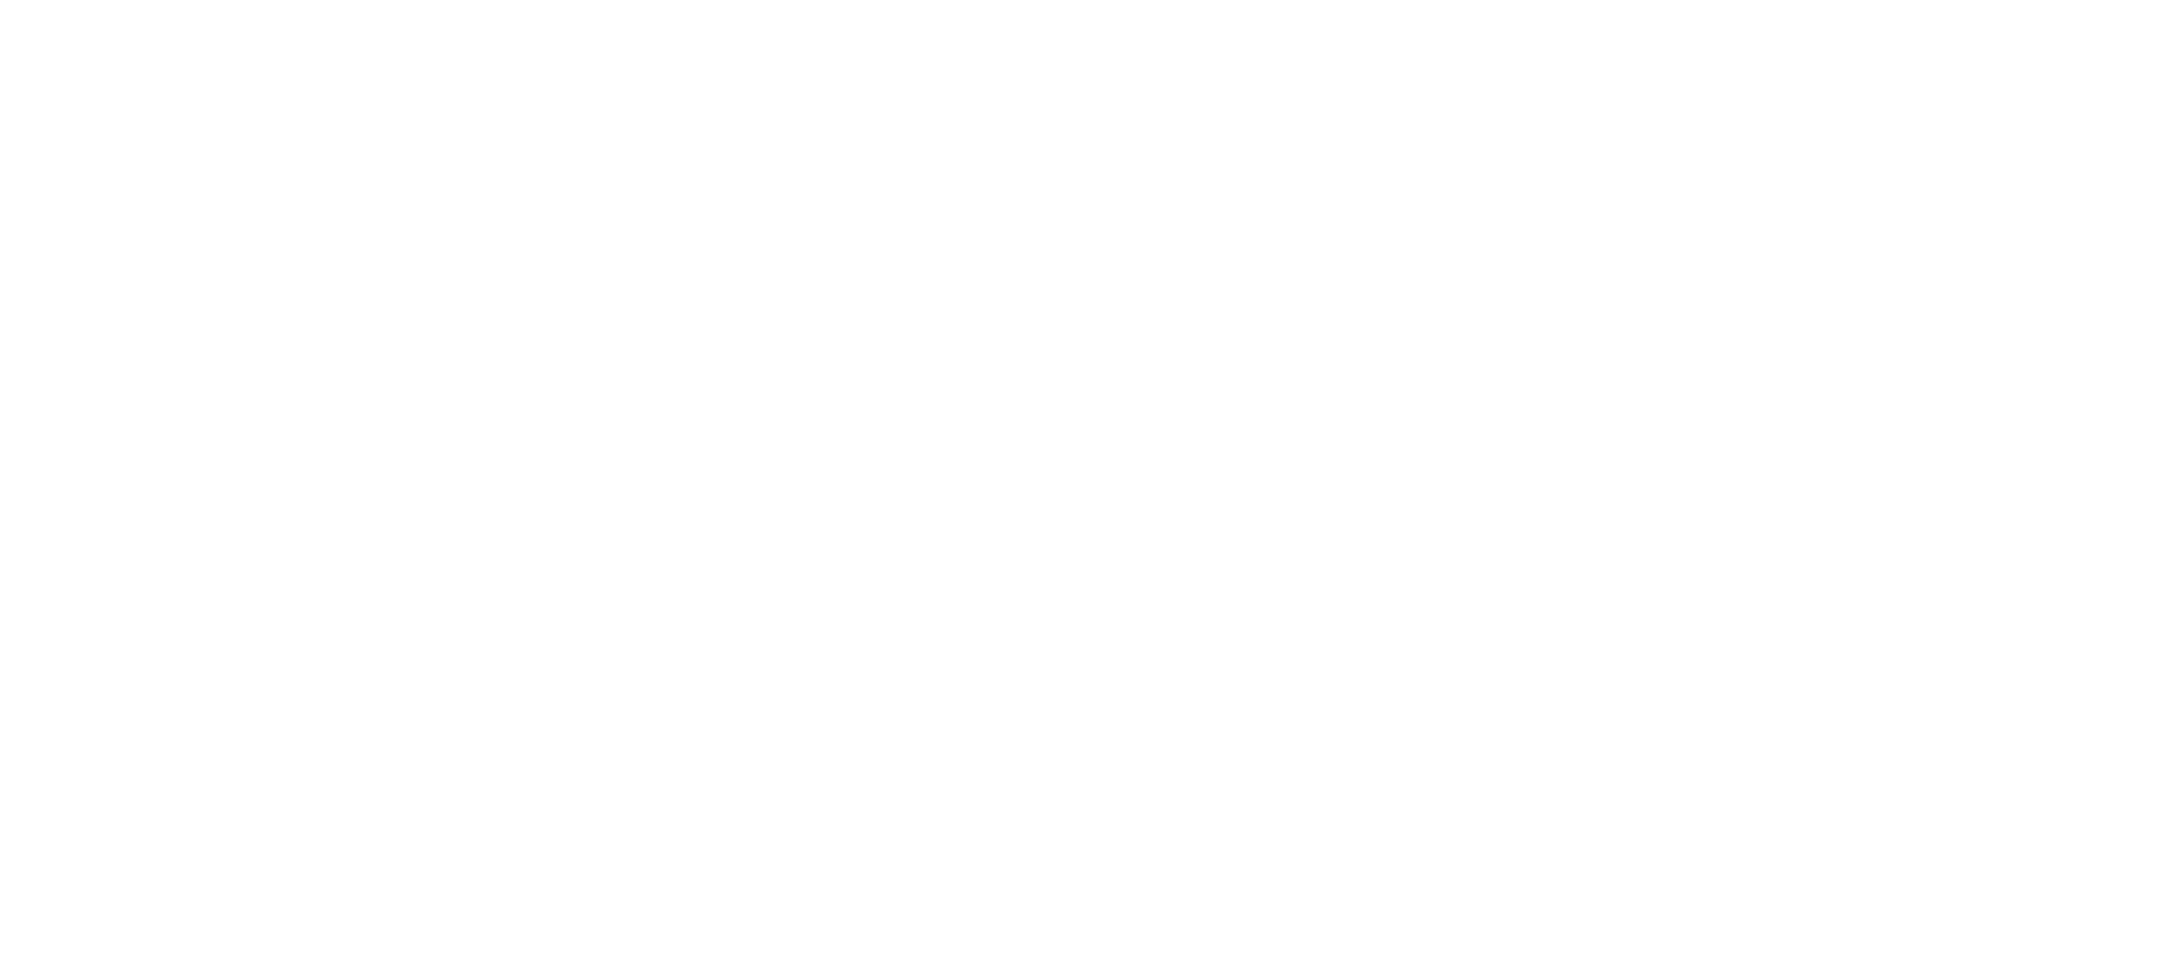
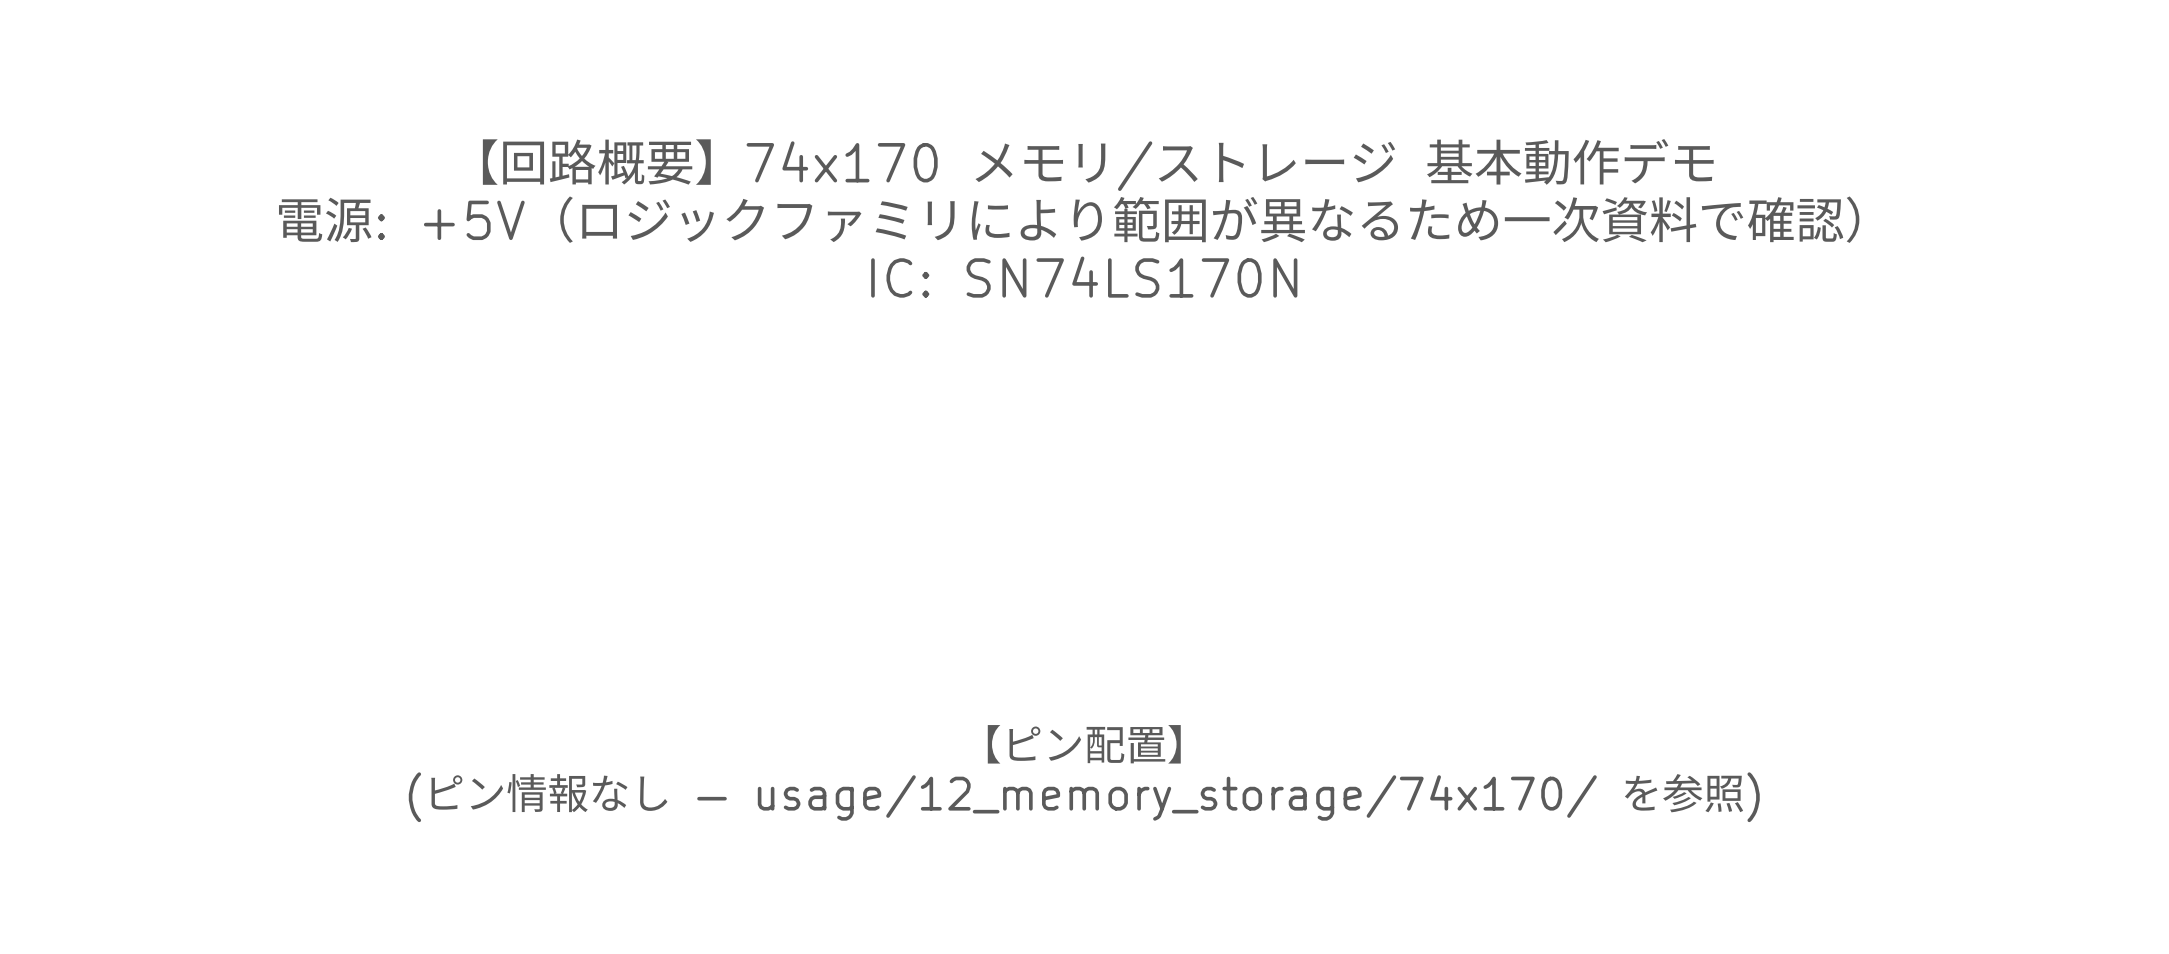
text: none -> 【回路概要】74x170 メモリ/ストレージ 基本動作デモ (1098, 164)
text: none -> 電源: +5V（ロジックファミリにより範囲が異なるため一次資料で確認） (1069, 219)
text: none -> IC: SN74LS170N (1084, 277)
text: none -> 【ピン配置】 (1084, 744)
text: none -> (ピン情報なし — usage/12_memory_storage/74x170/ を参照) (1084, 797)

